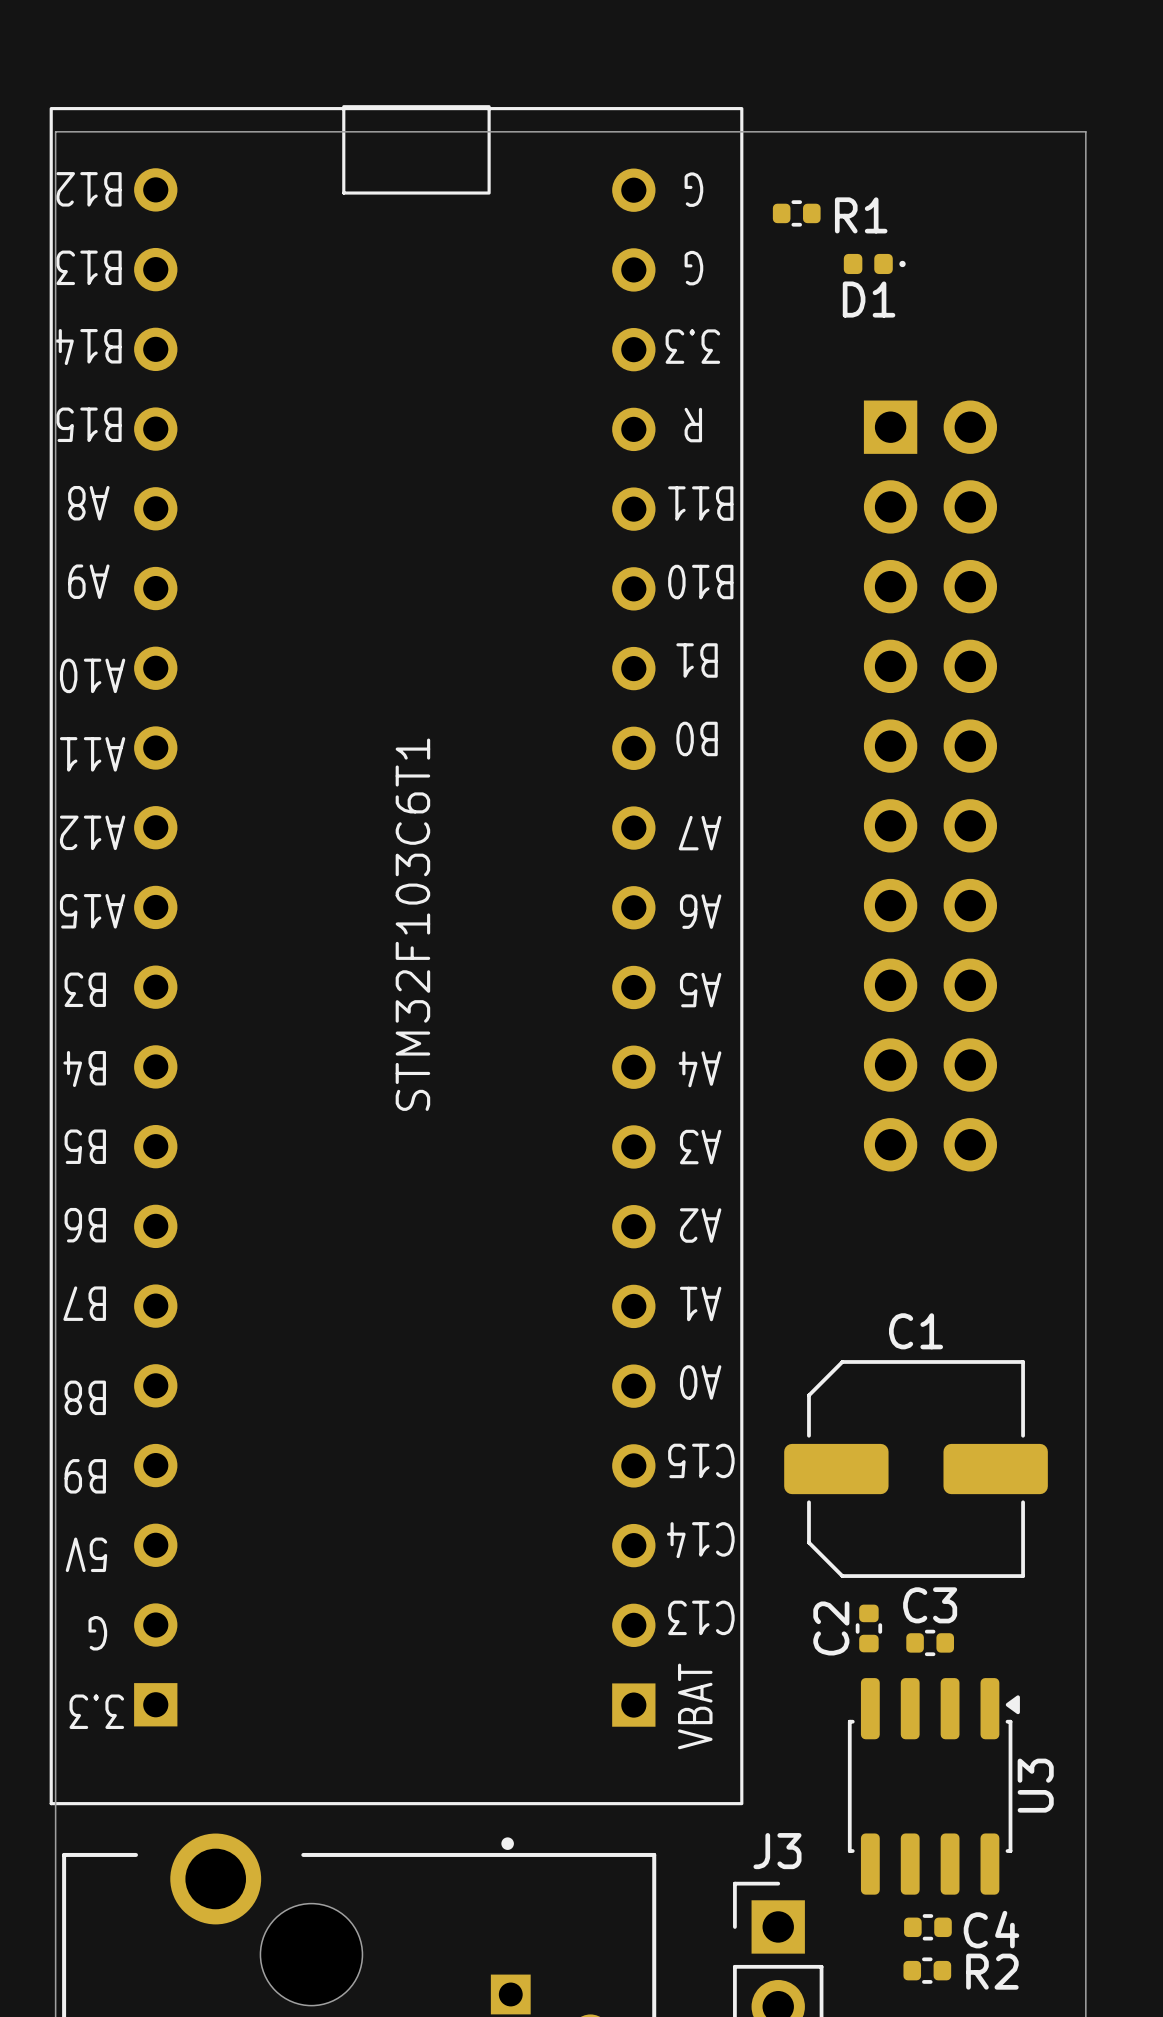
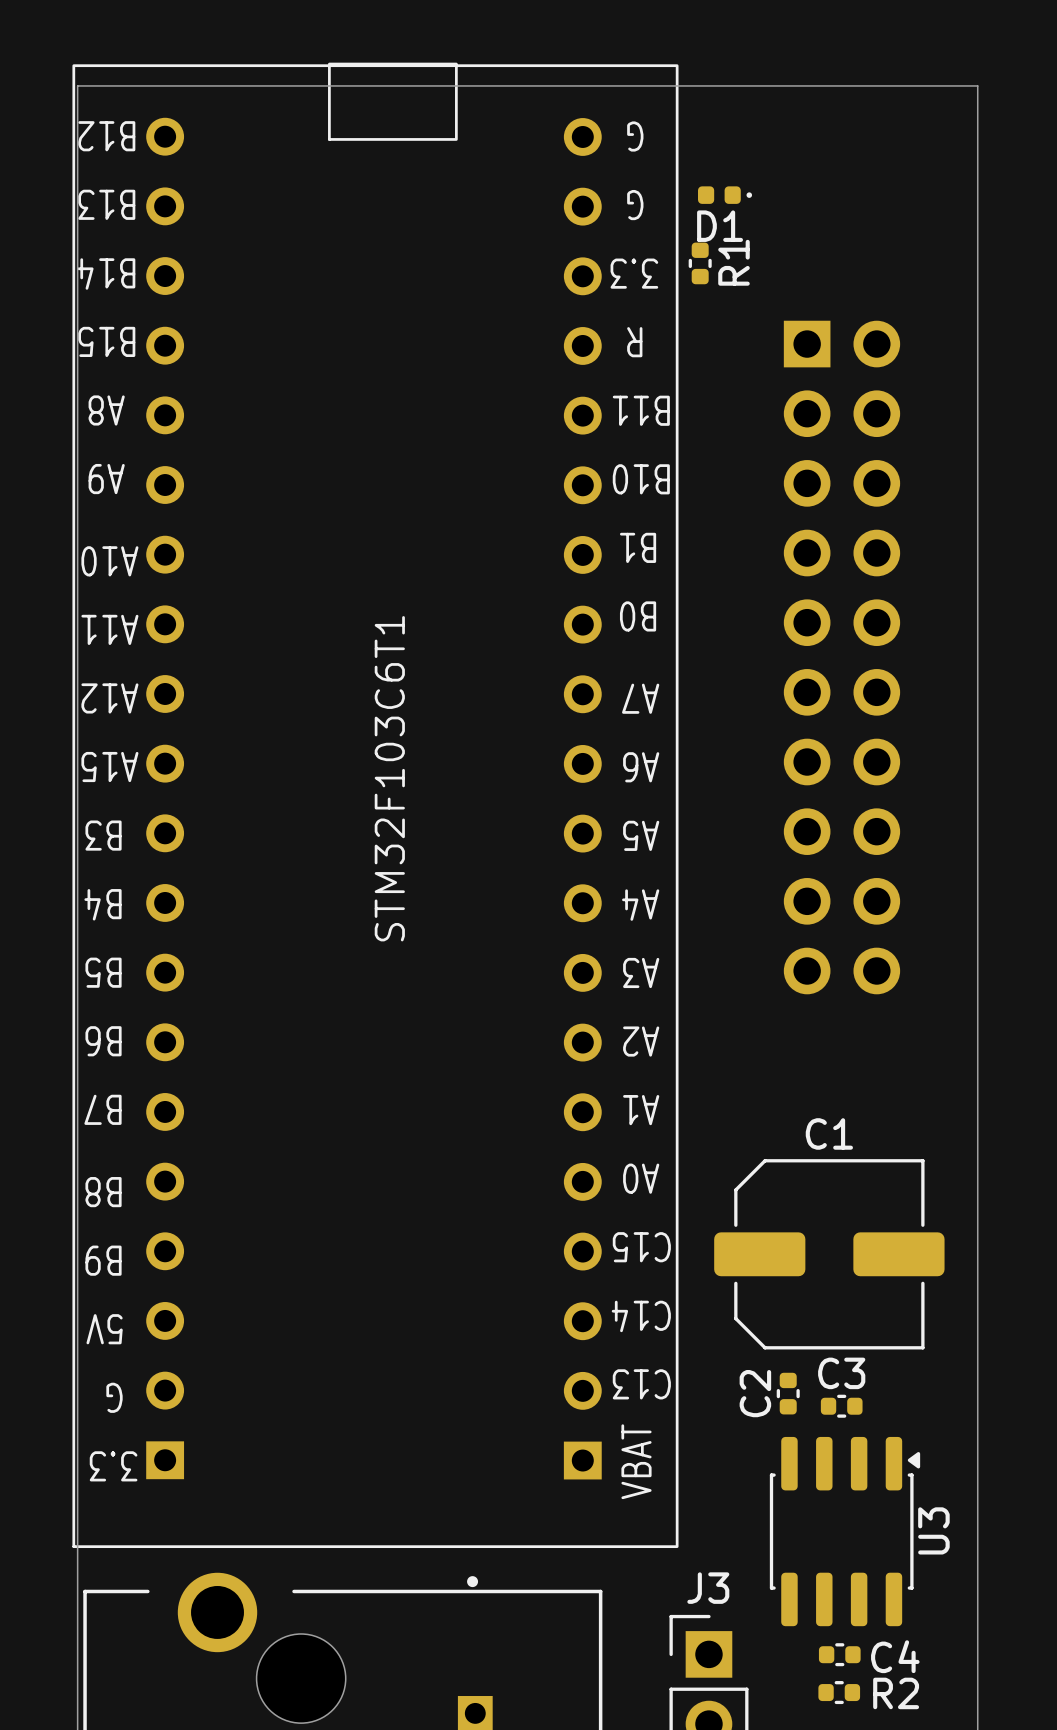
R1 rotation: 0° (796, 213) -> 90° clockwise (700, 263)
R1 position: (796, 213) -> (700, 263)
D1 position: (874, 263) -> (725, 195)

